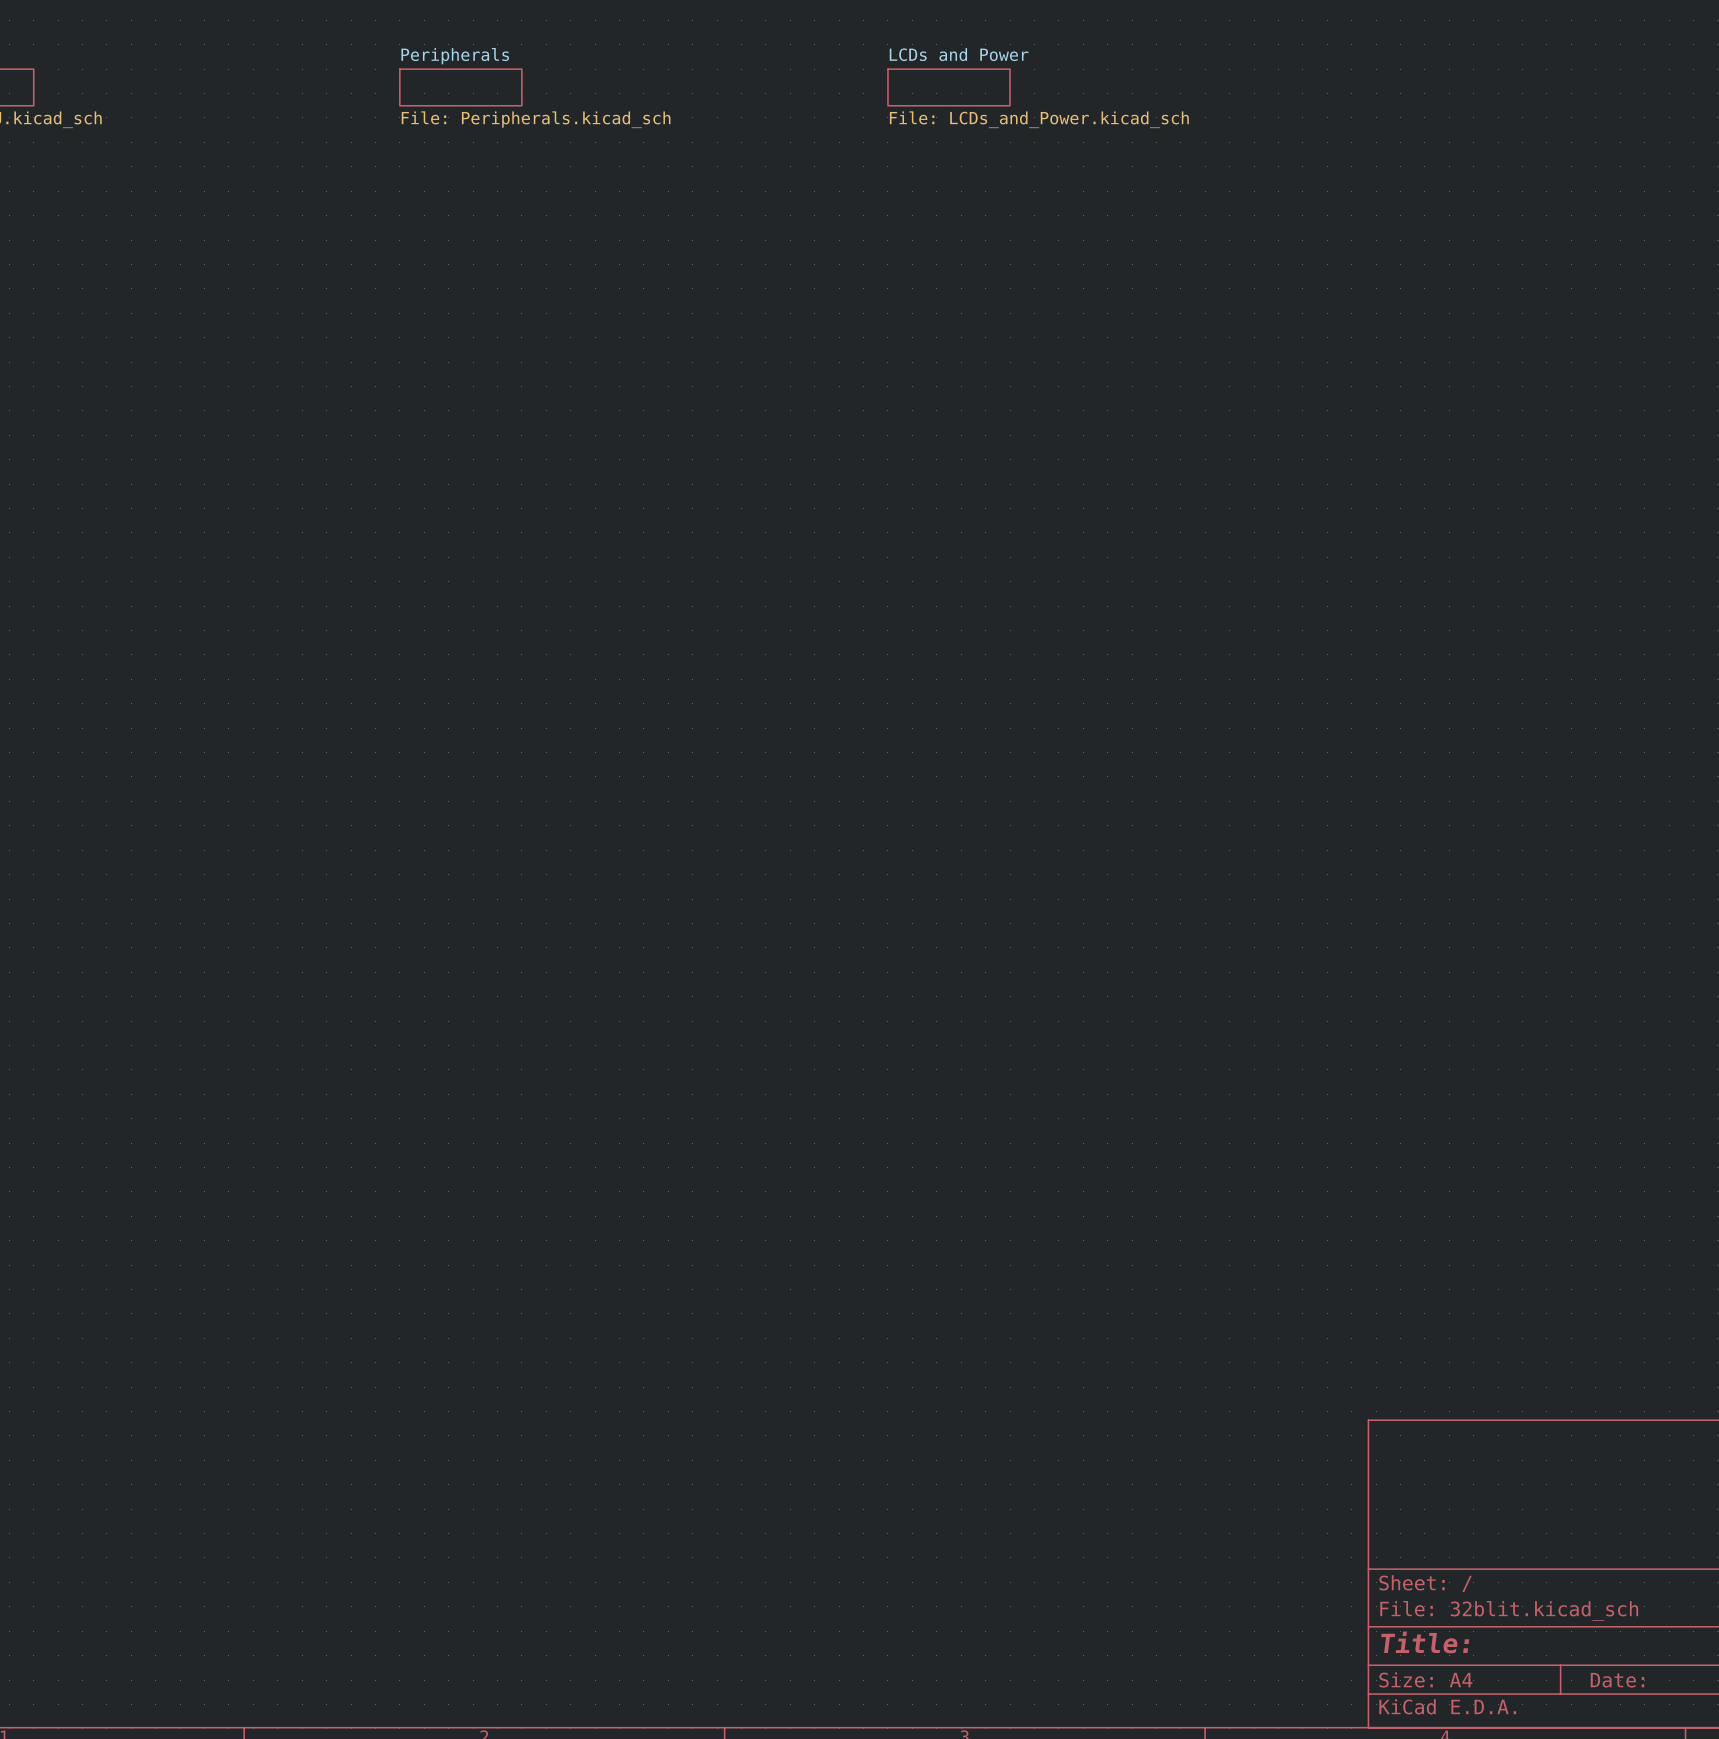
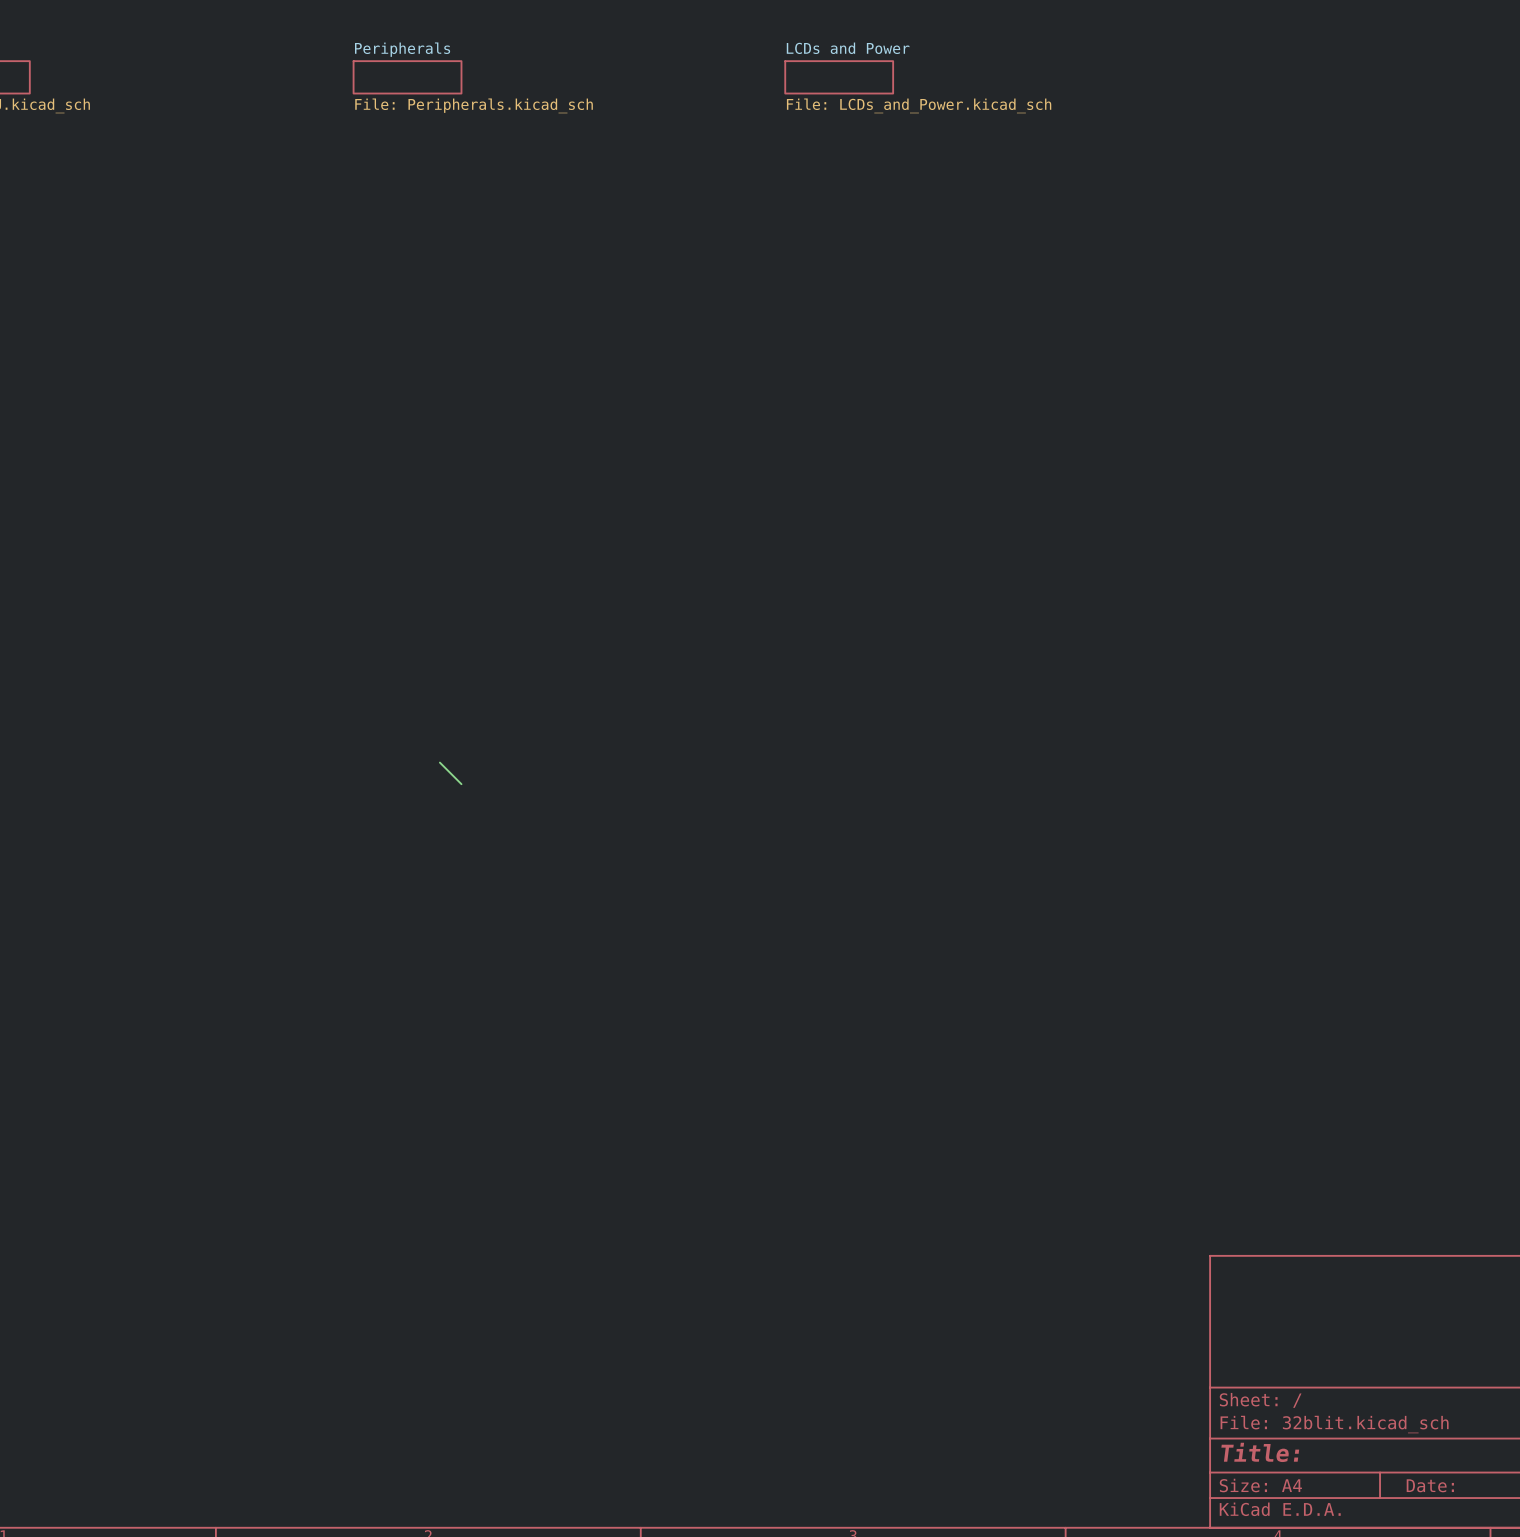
wire: none -> (439, 762) (461, 784)

